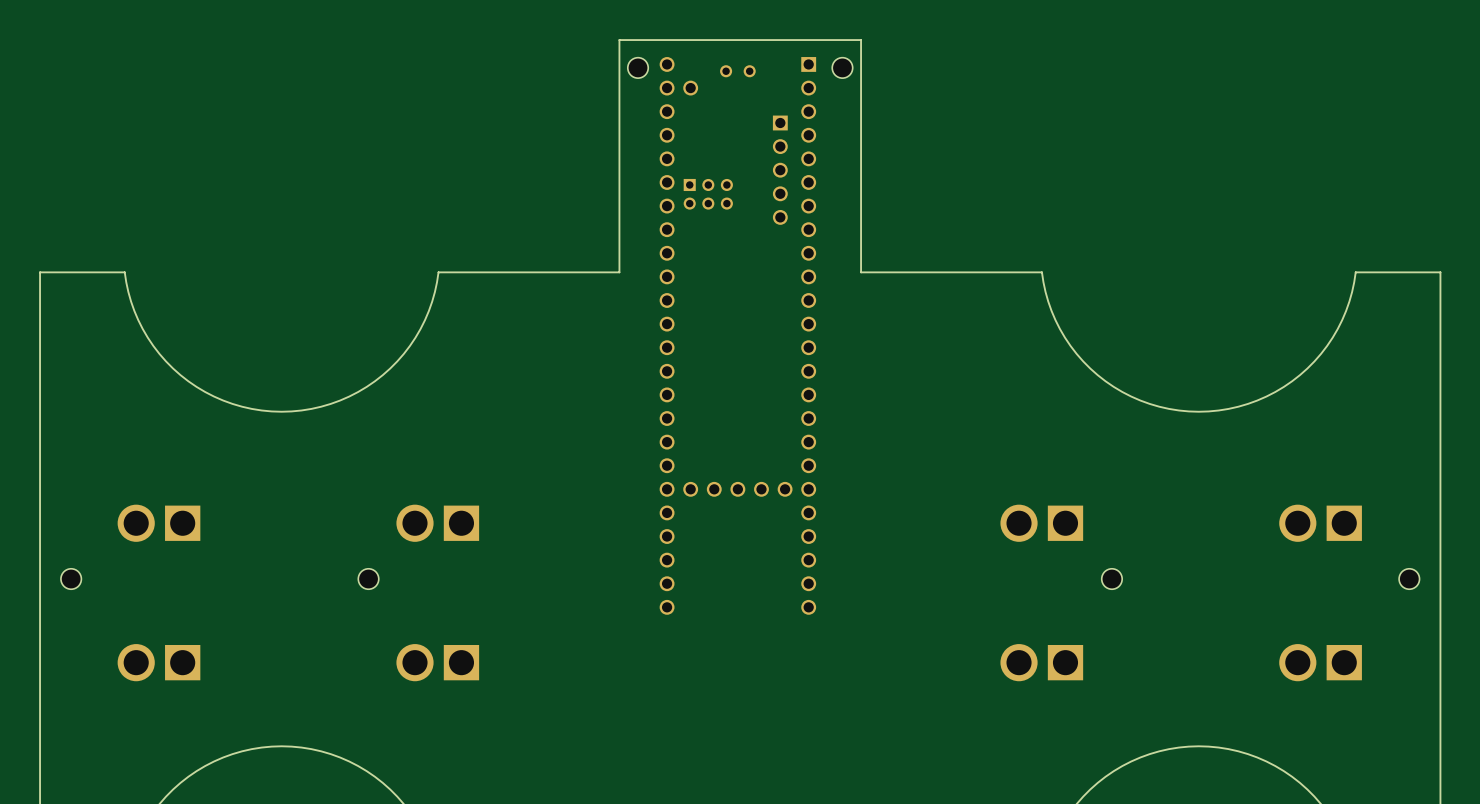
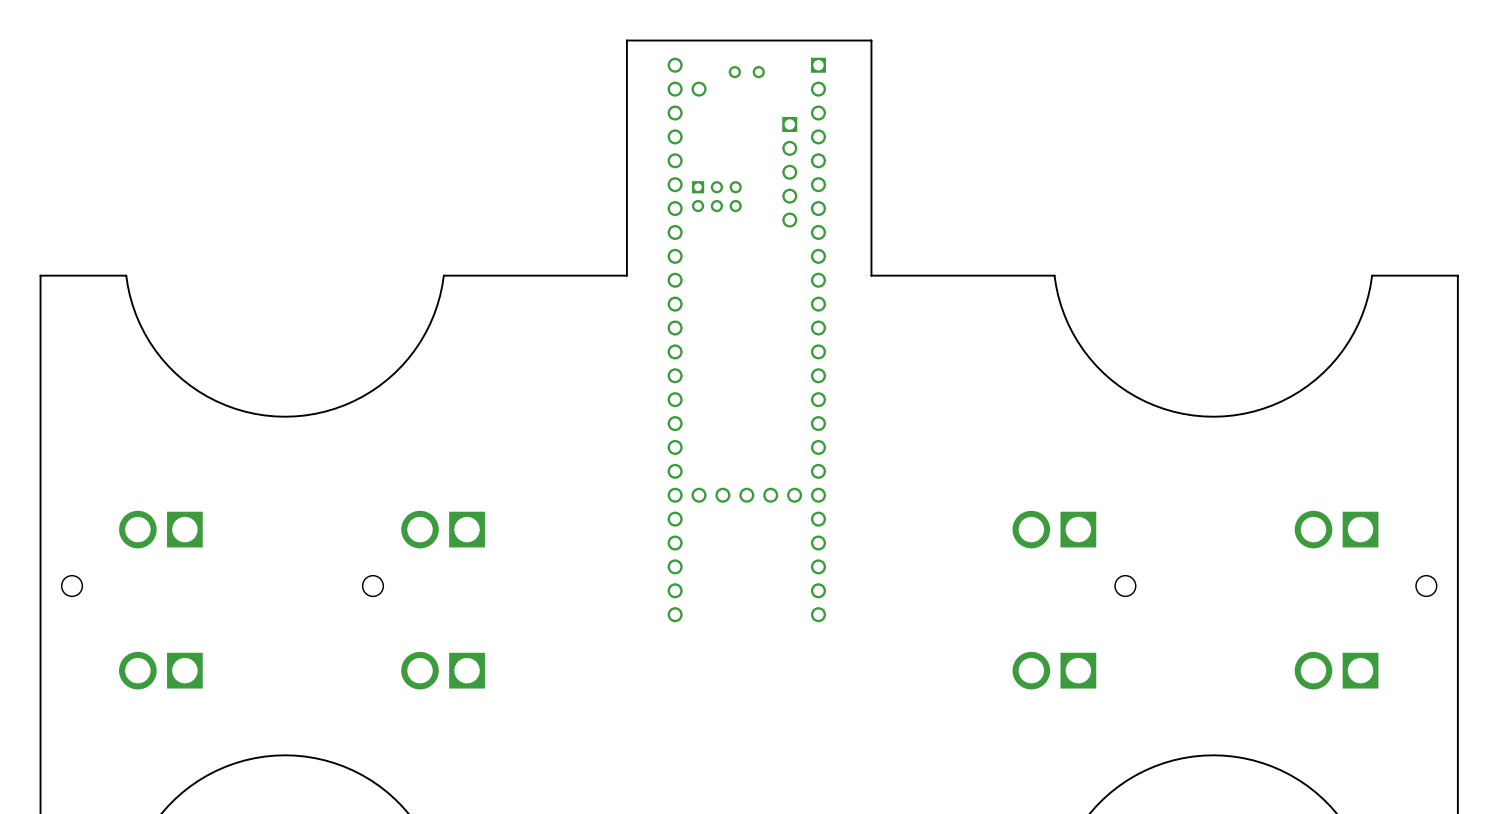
part: (638, 67) -> none
part: (842, 67) -> none

